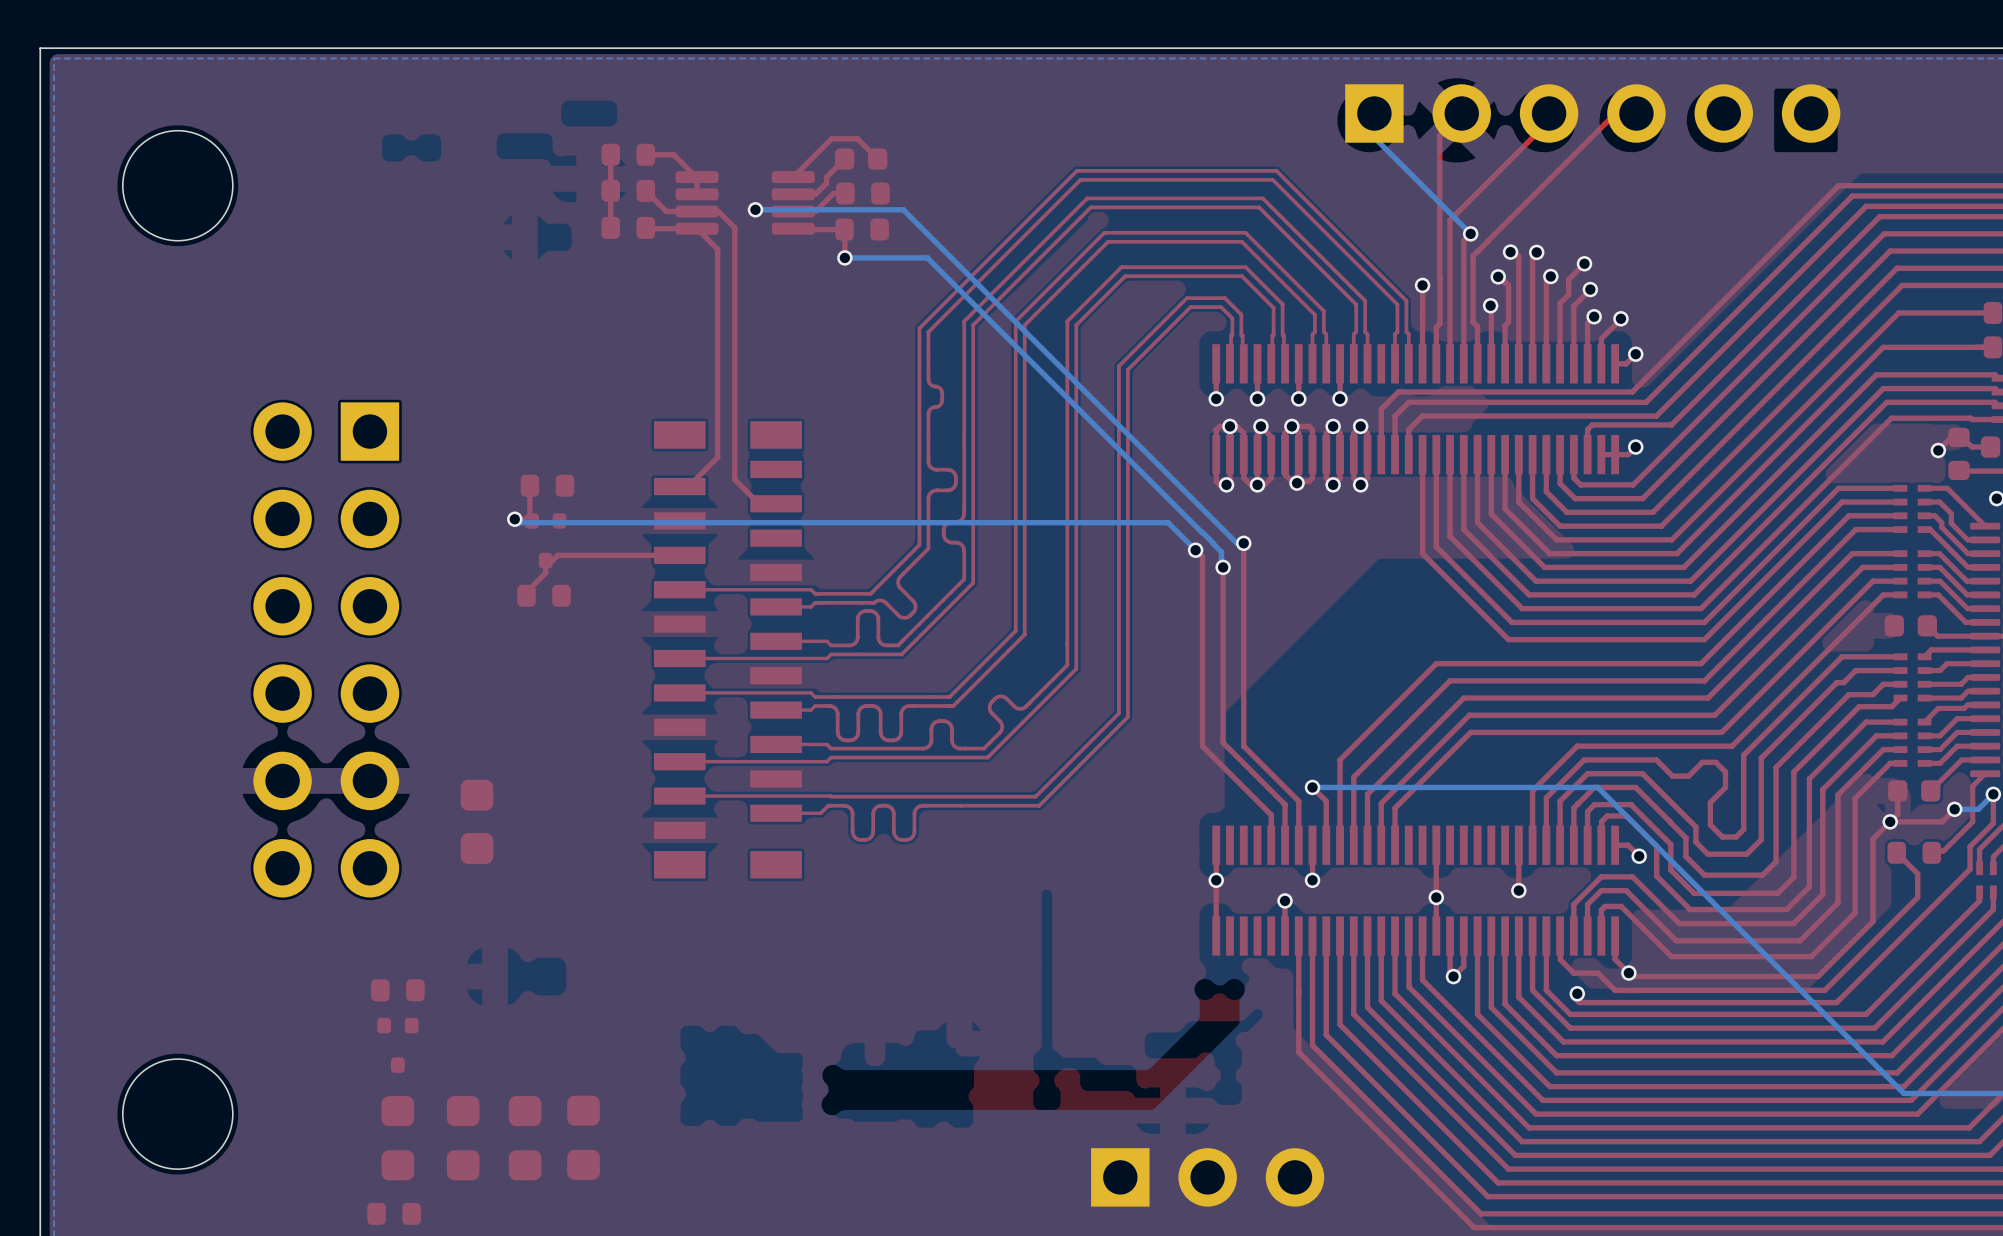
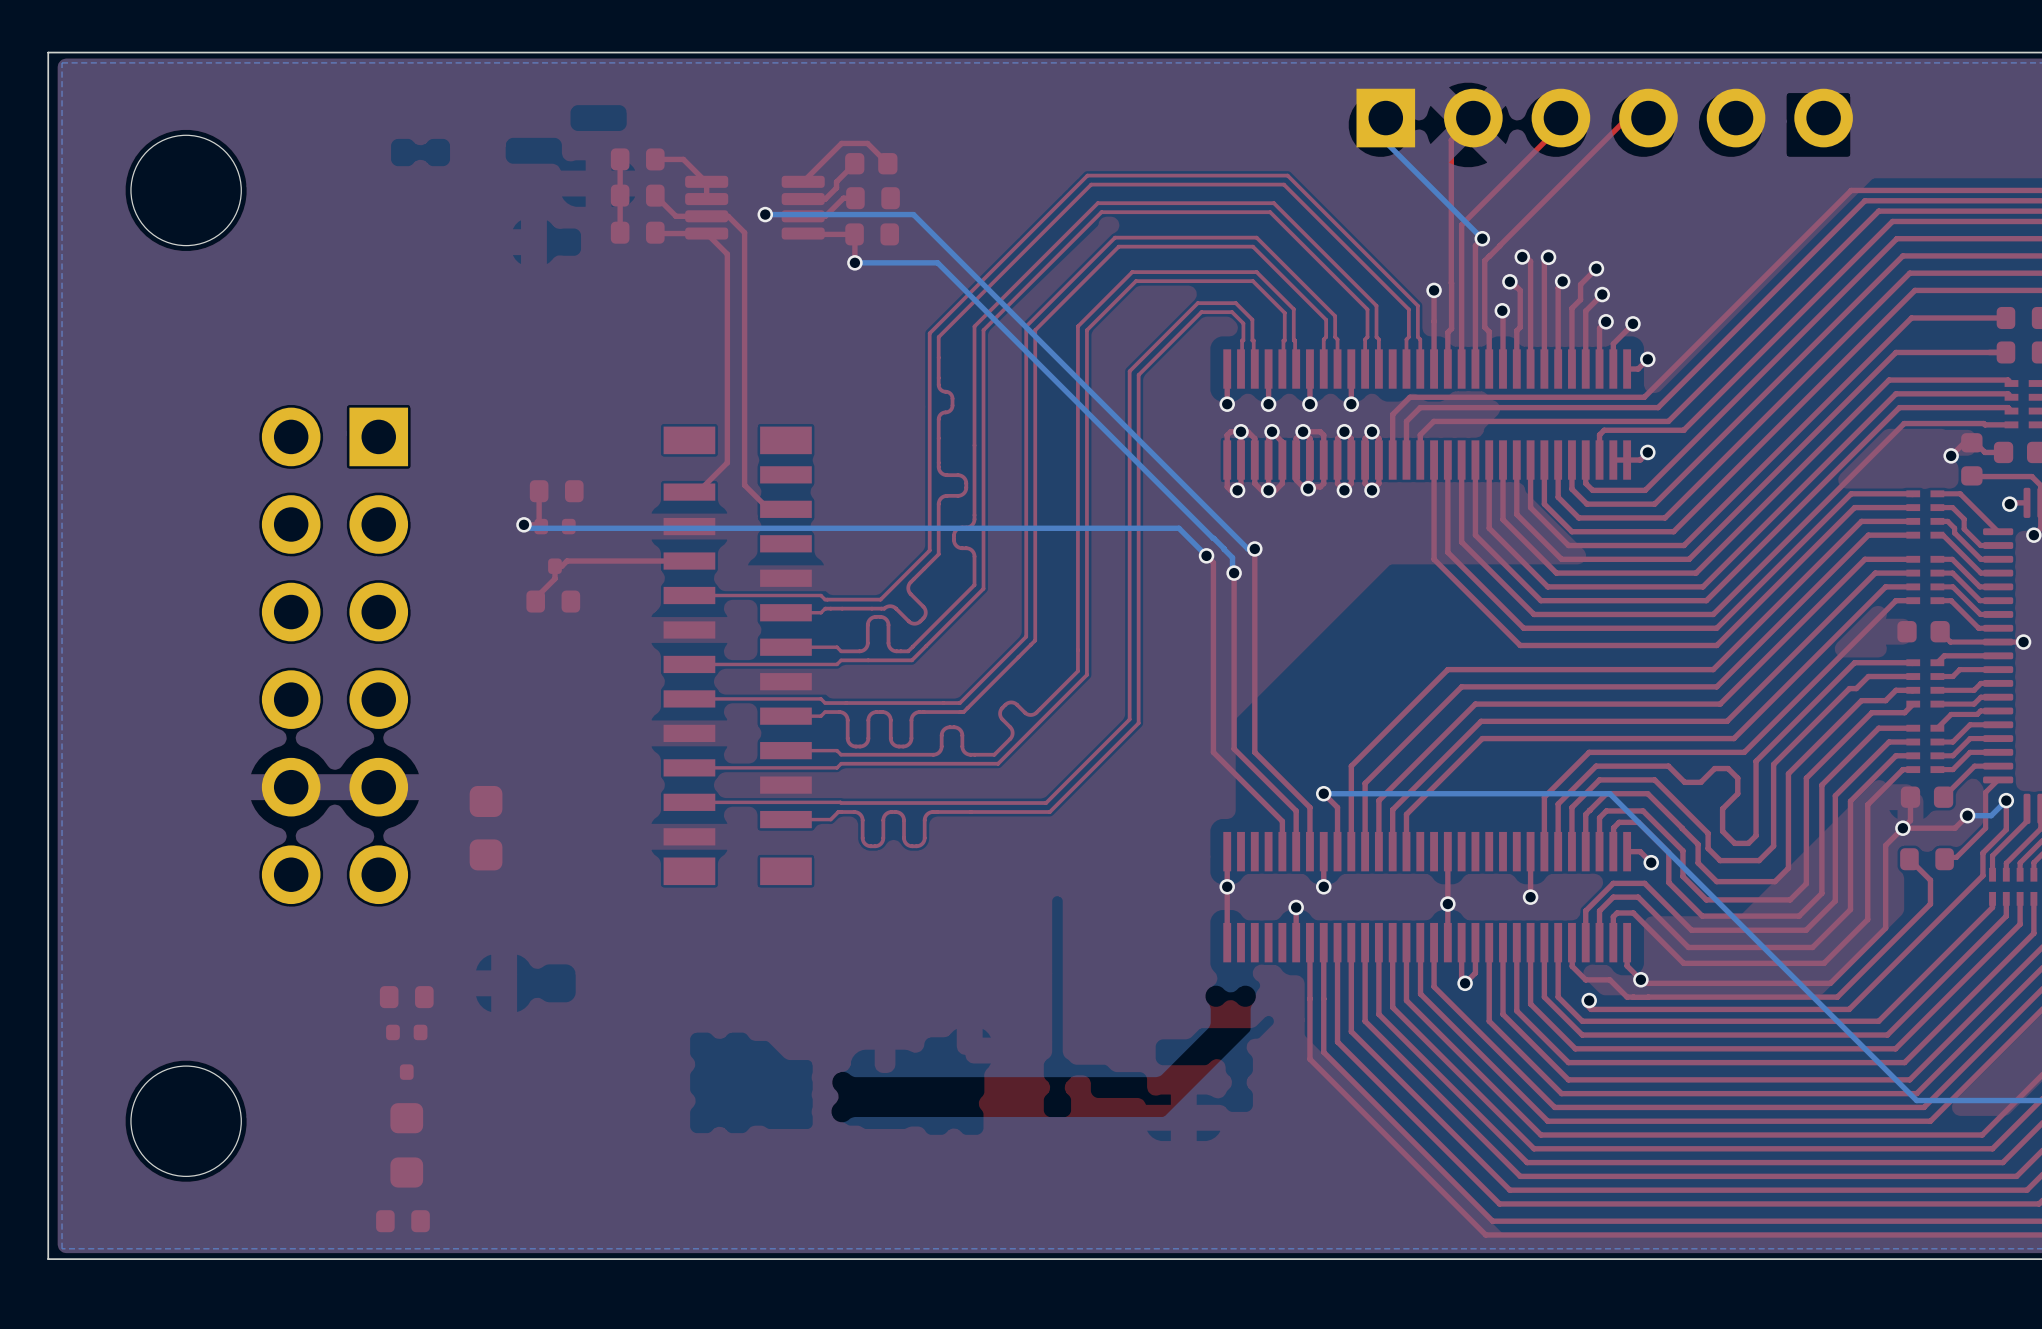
part: (583, 1137) -> none
part: (463, 1138) -> none
part: (525, 1138) -> none
part: (1207, 1177) -> none

